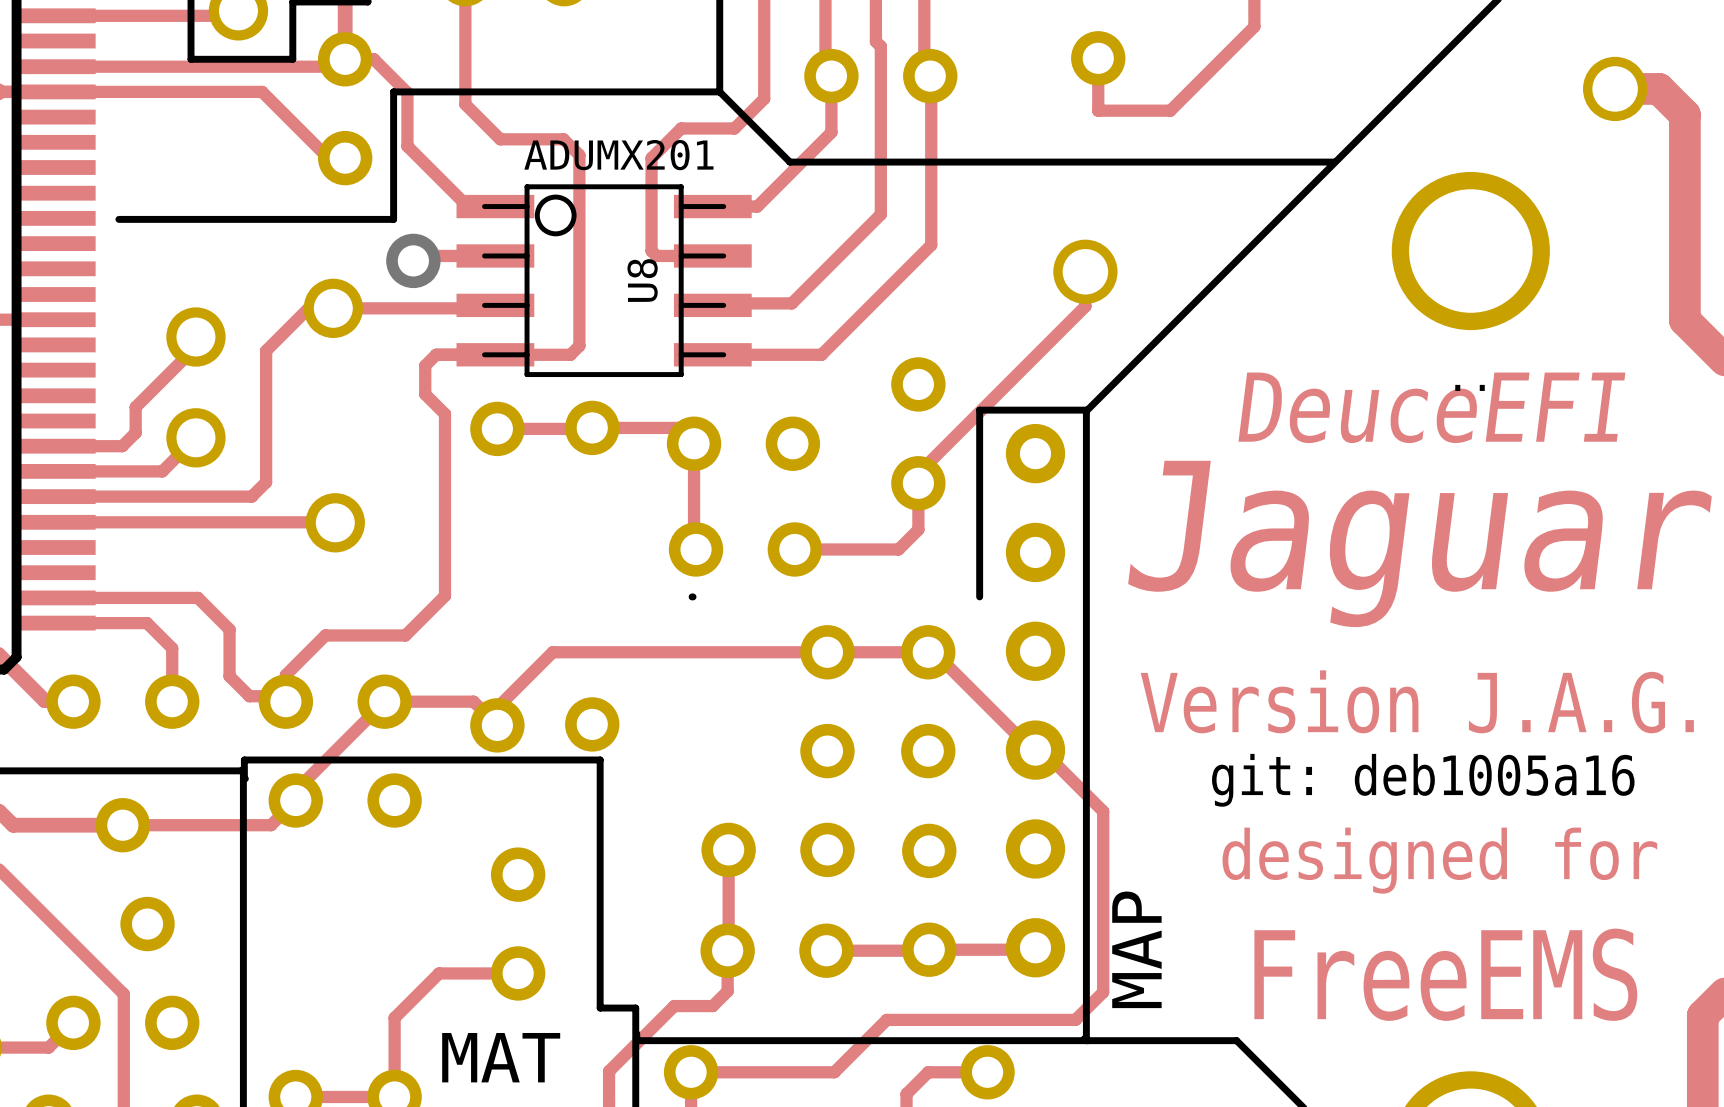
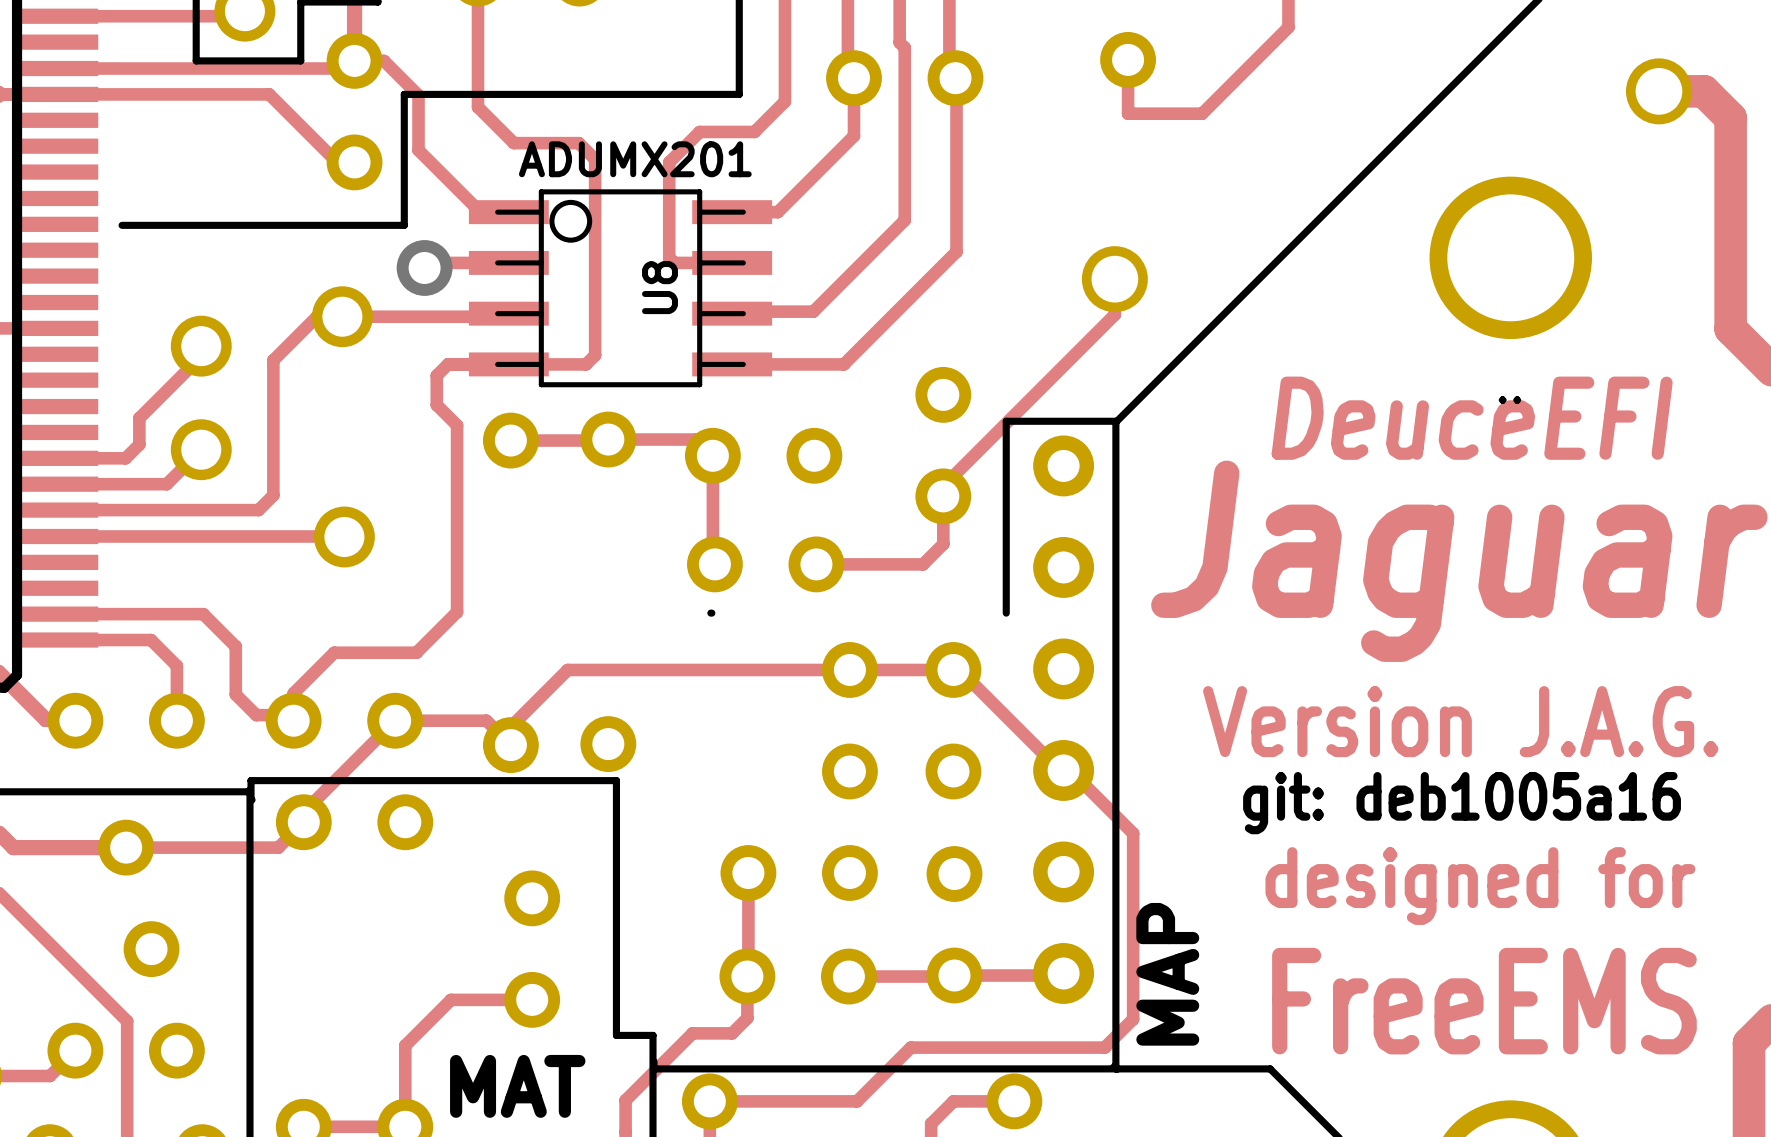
line: (718, 90) (789, 162) (1334, 162) -> none

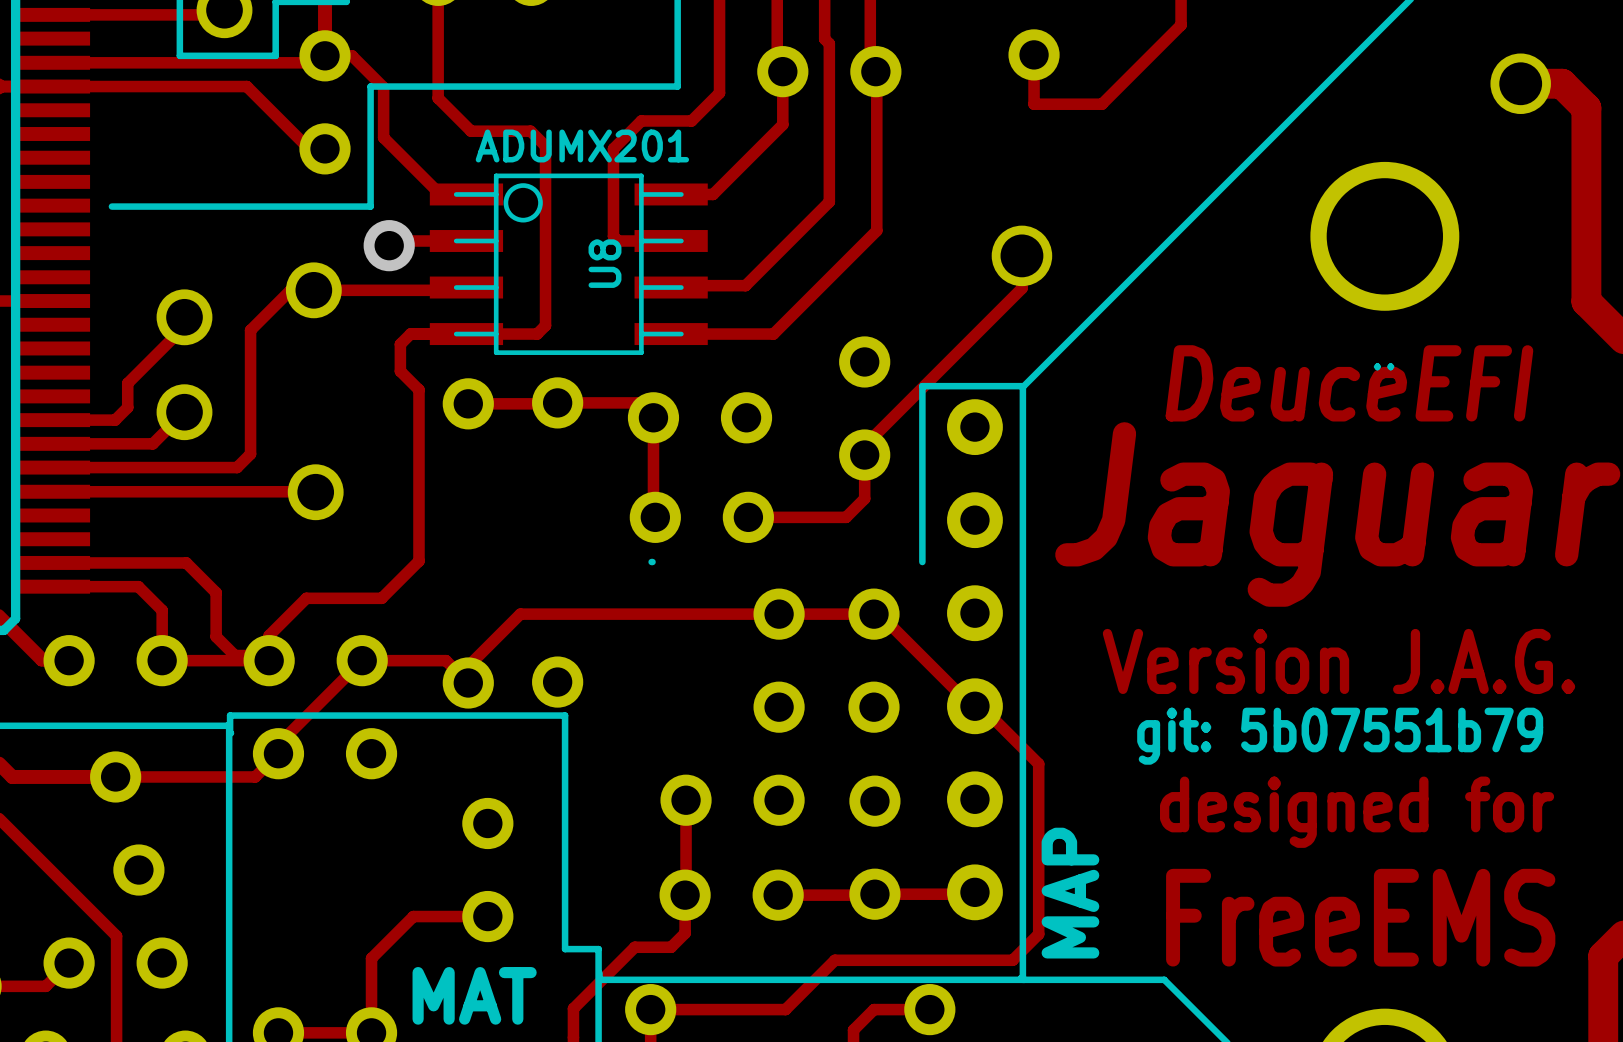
track: none -> (162, 660) (269, 660)
text: git: deb1005a16 (1462, 803) -> git: 5b07551b79 (1340, 736)

